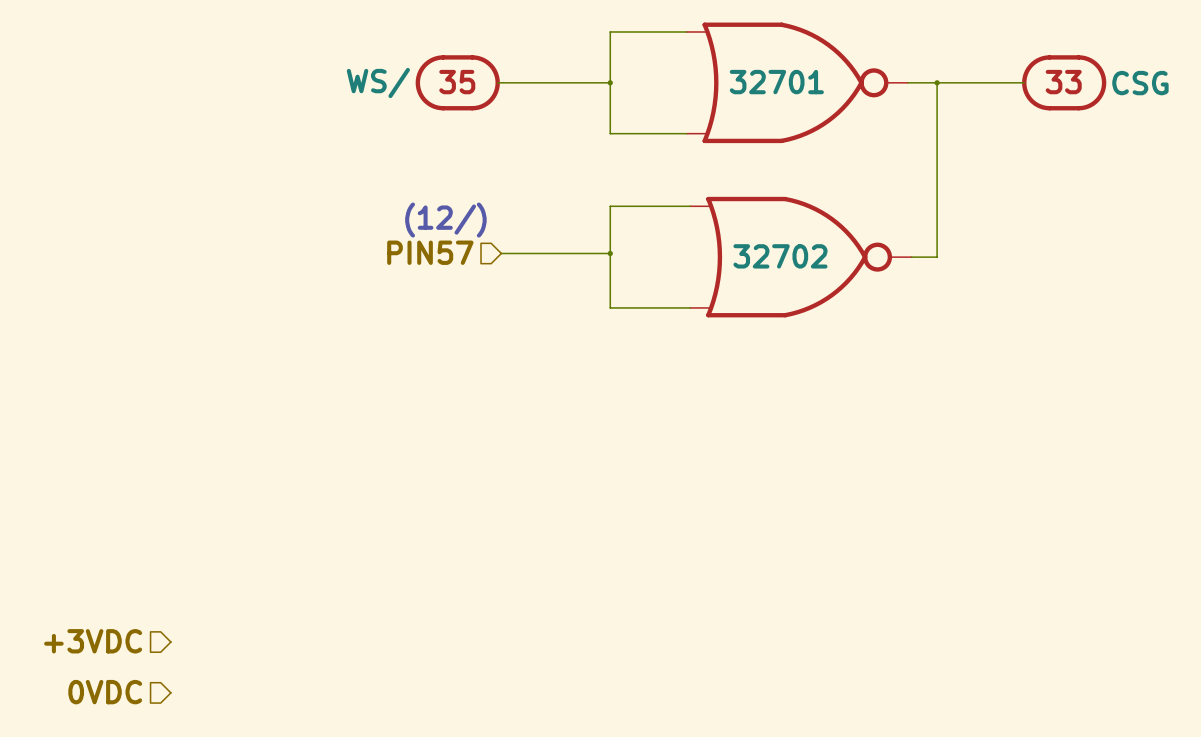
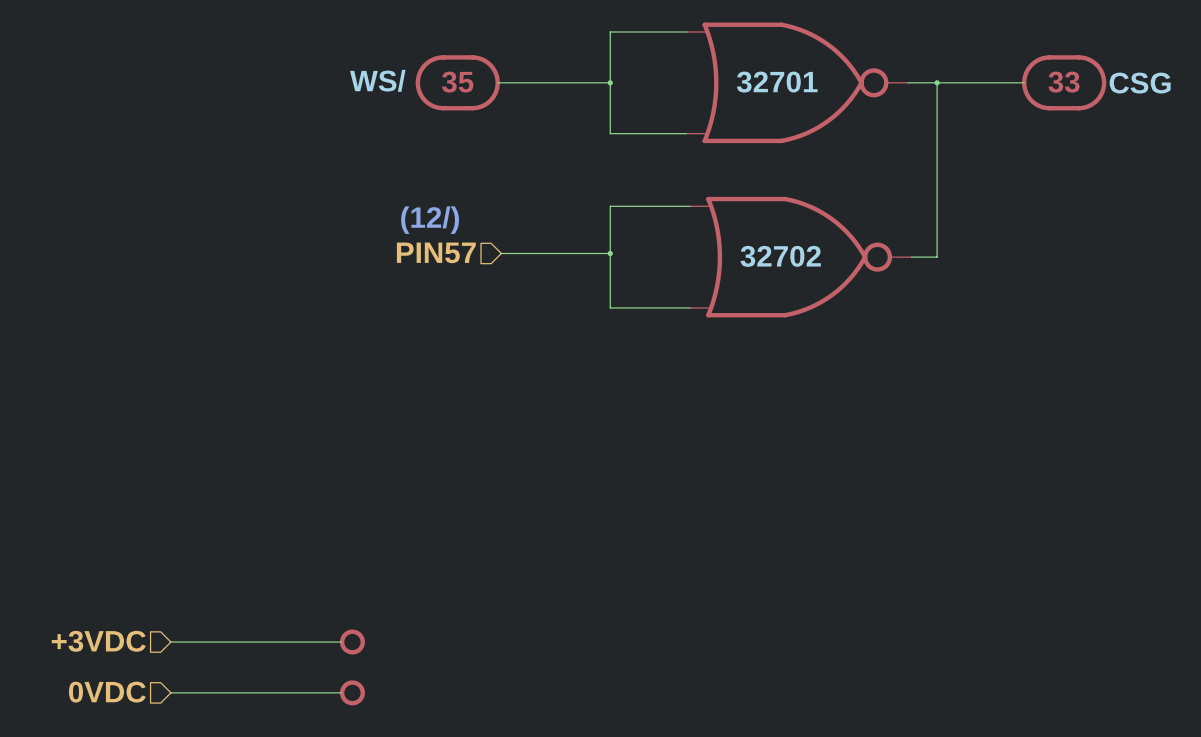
wire: none -> (170, 642) (341, 642)
part: none -> (352, 642)
wire: none -> (170, 692) (341, 692)
part: none -> (352, 692)

